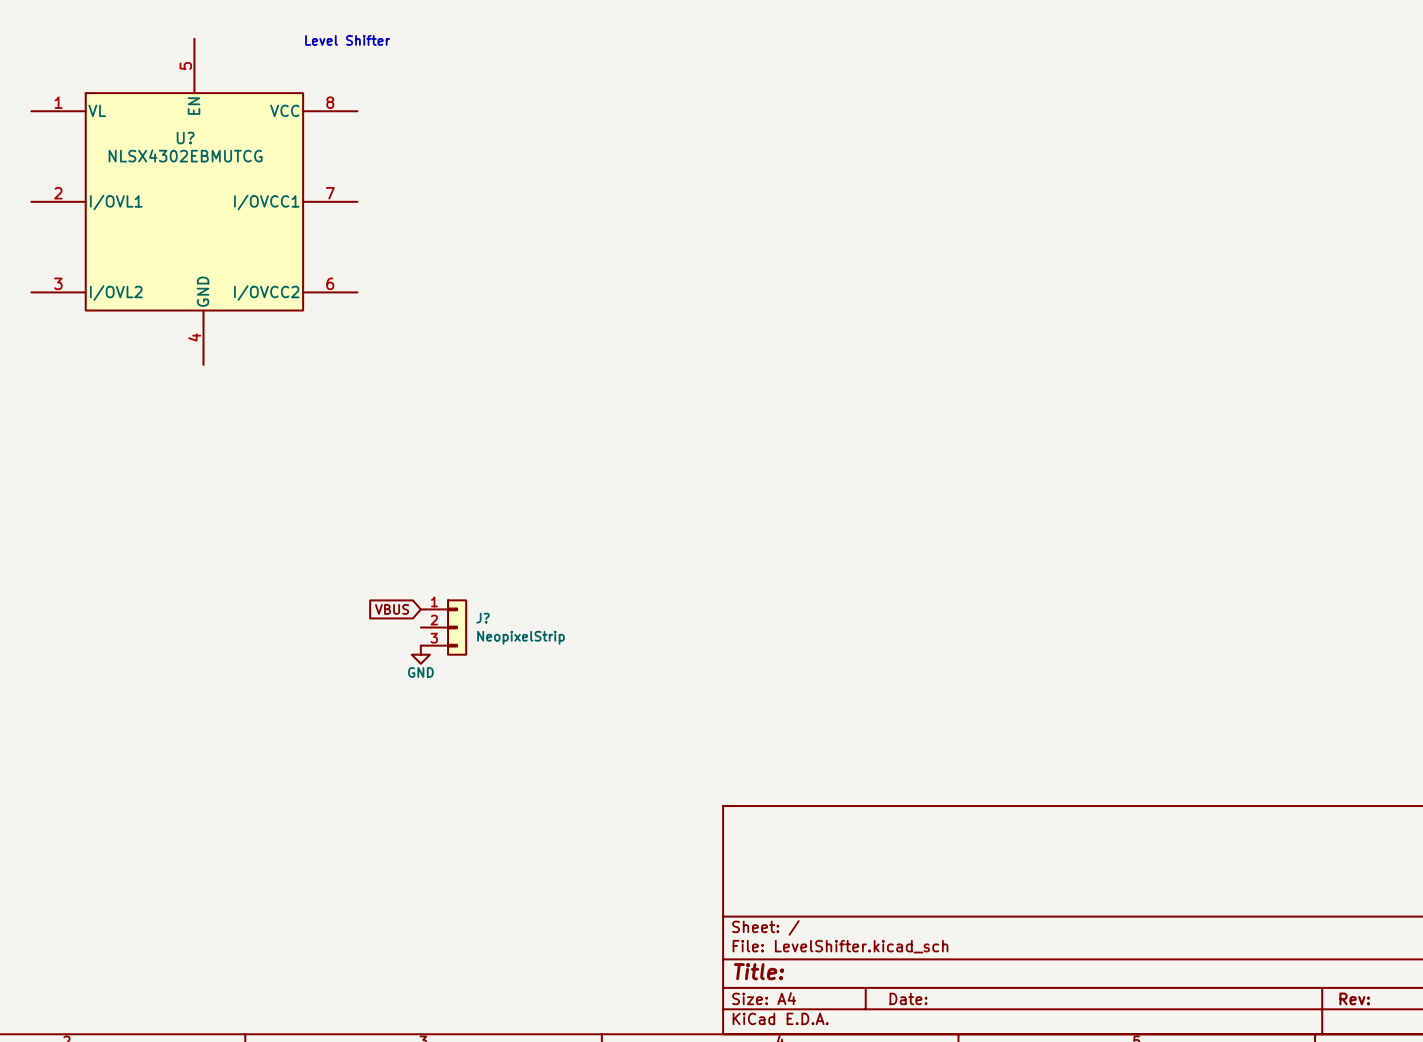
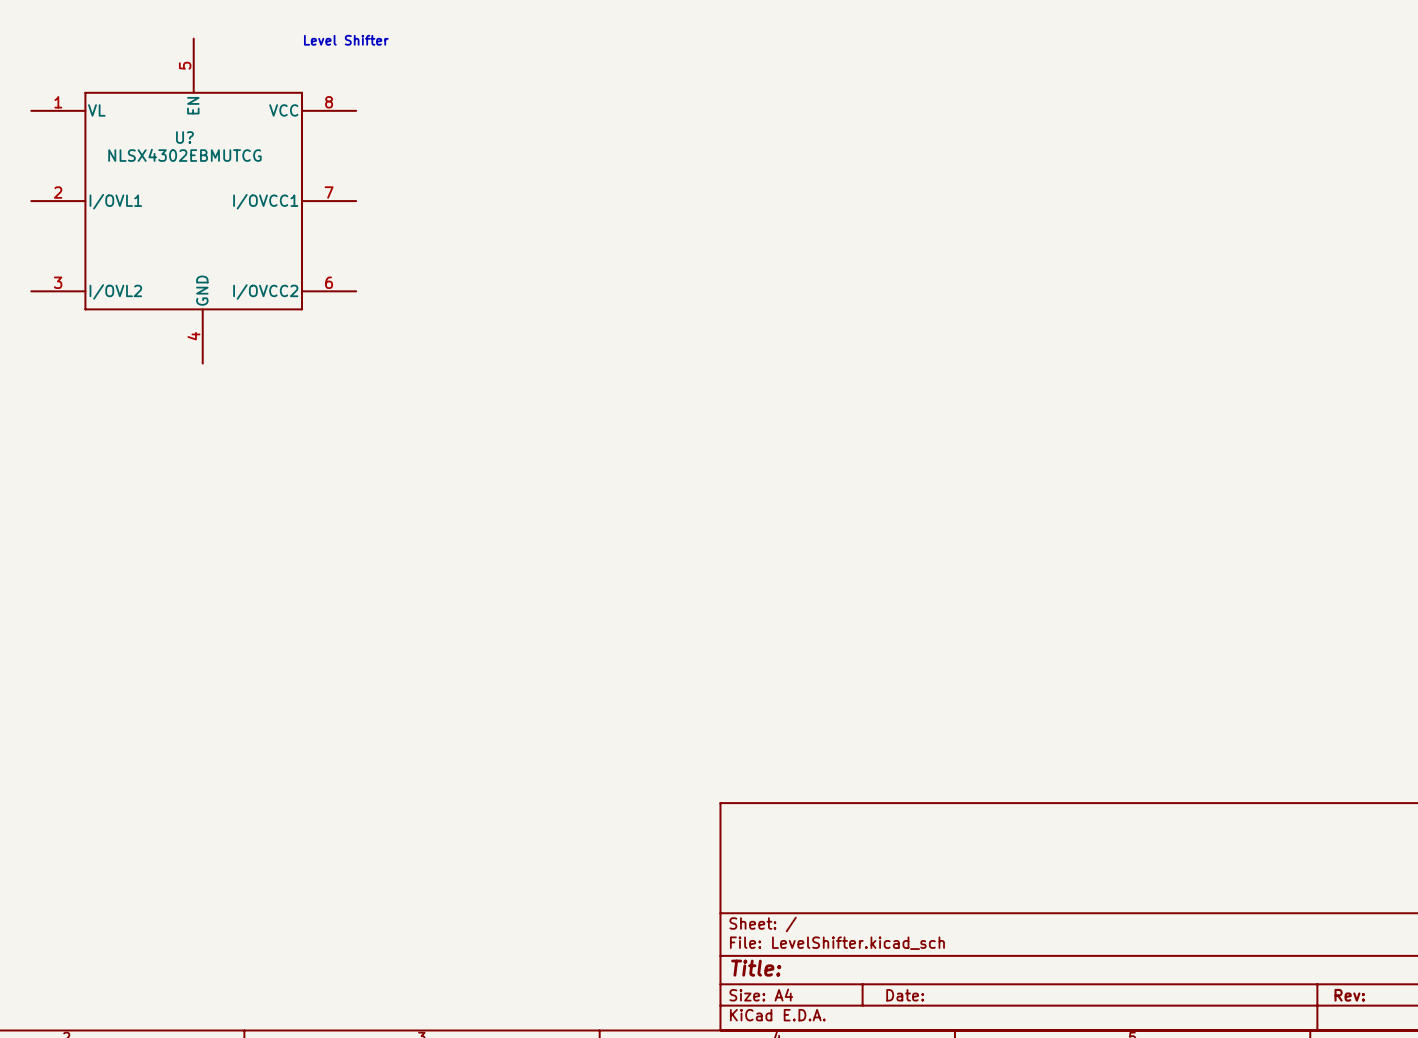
U? symbol: [31, 38, 358, 365] -> [31, 38, 357, 364]
global label: VBUS (392, 609) -> none
J?: NeopixelStrip (443, 627) -> none
power symbol: GND (420, 654) -> none

